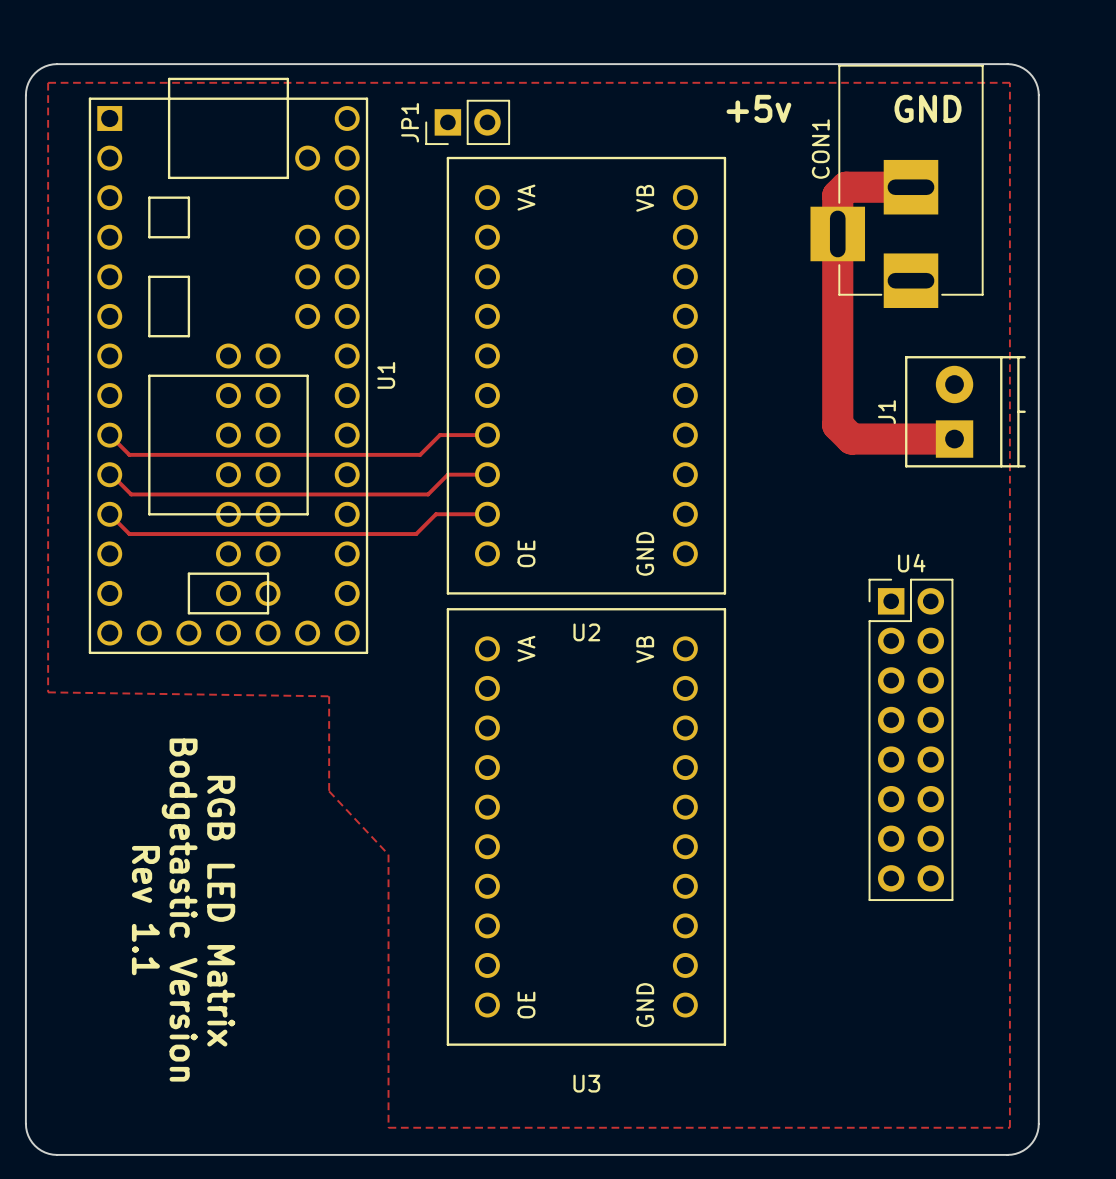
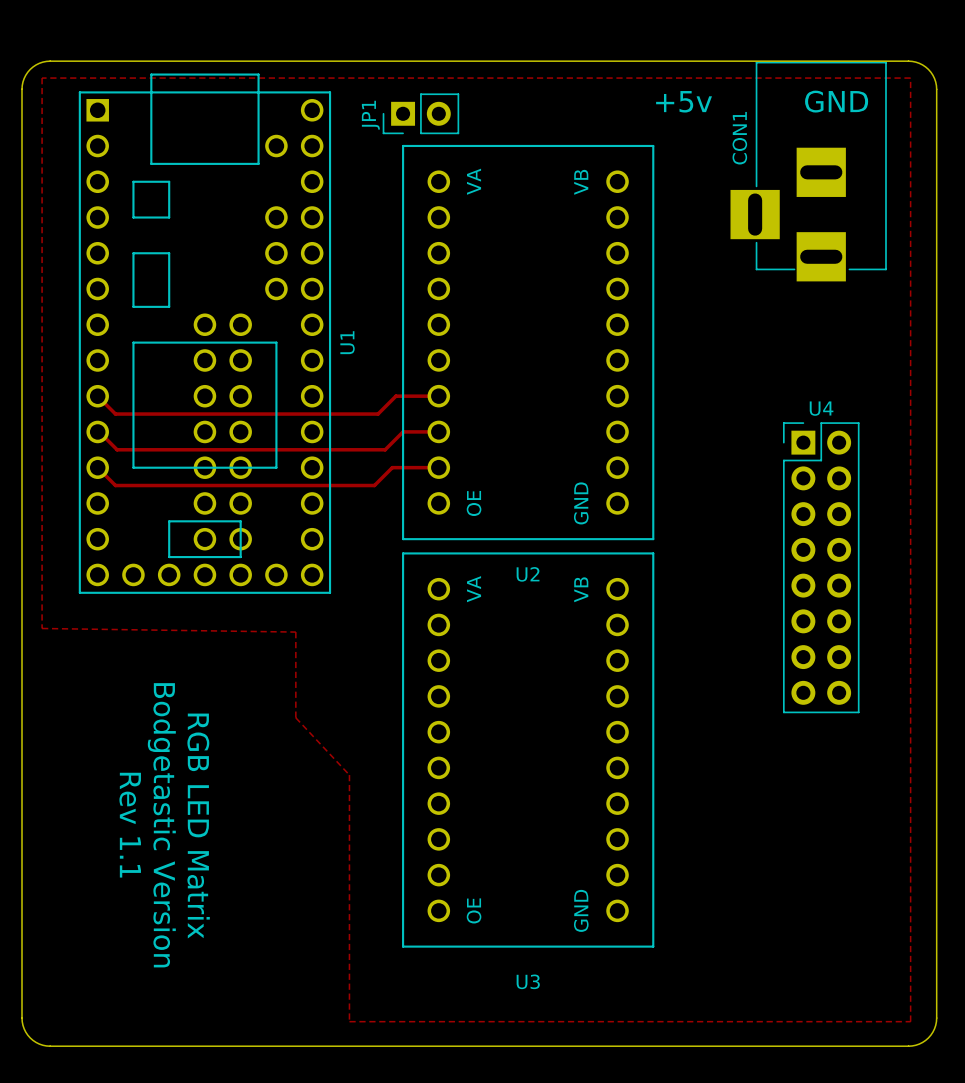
track: (910, 187) (846, 187) (837, 195) (837, 425) (851, 439) (954, 439) -> none
J1: (965, 411) -> none
U4 position: (910, 739) -> (821, 567)

